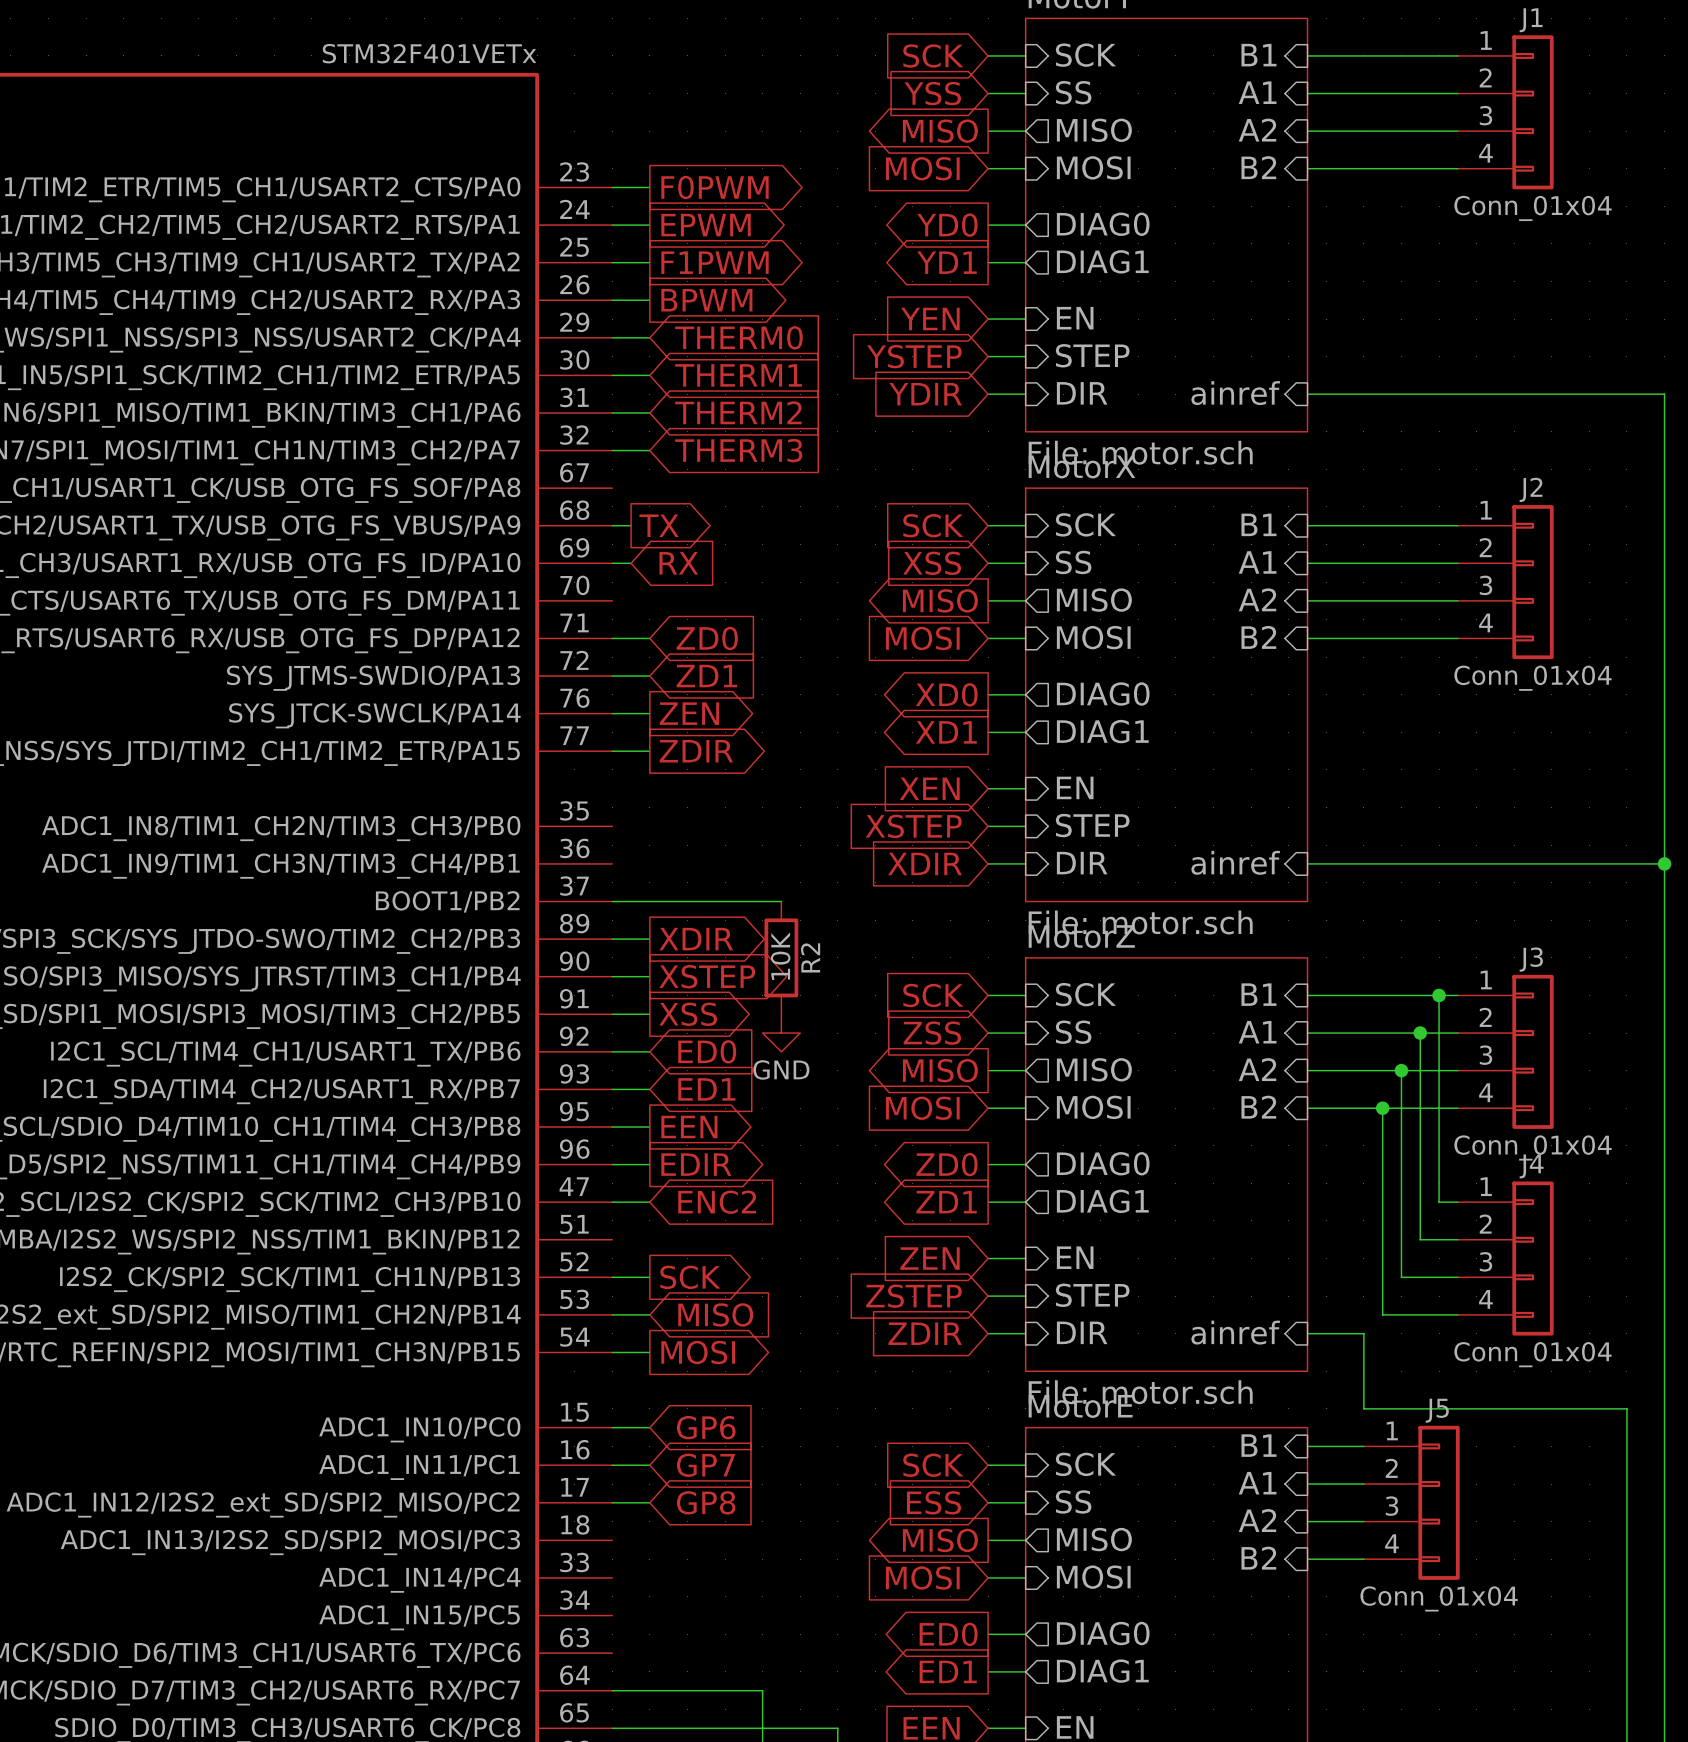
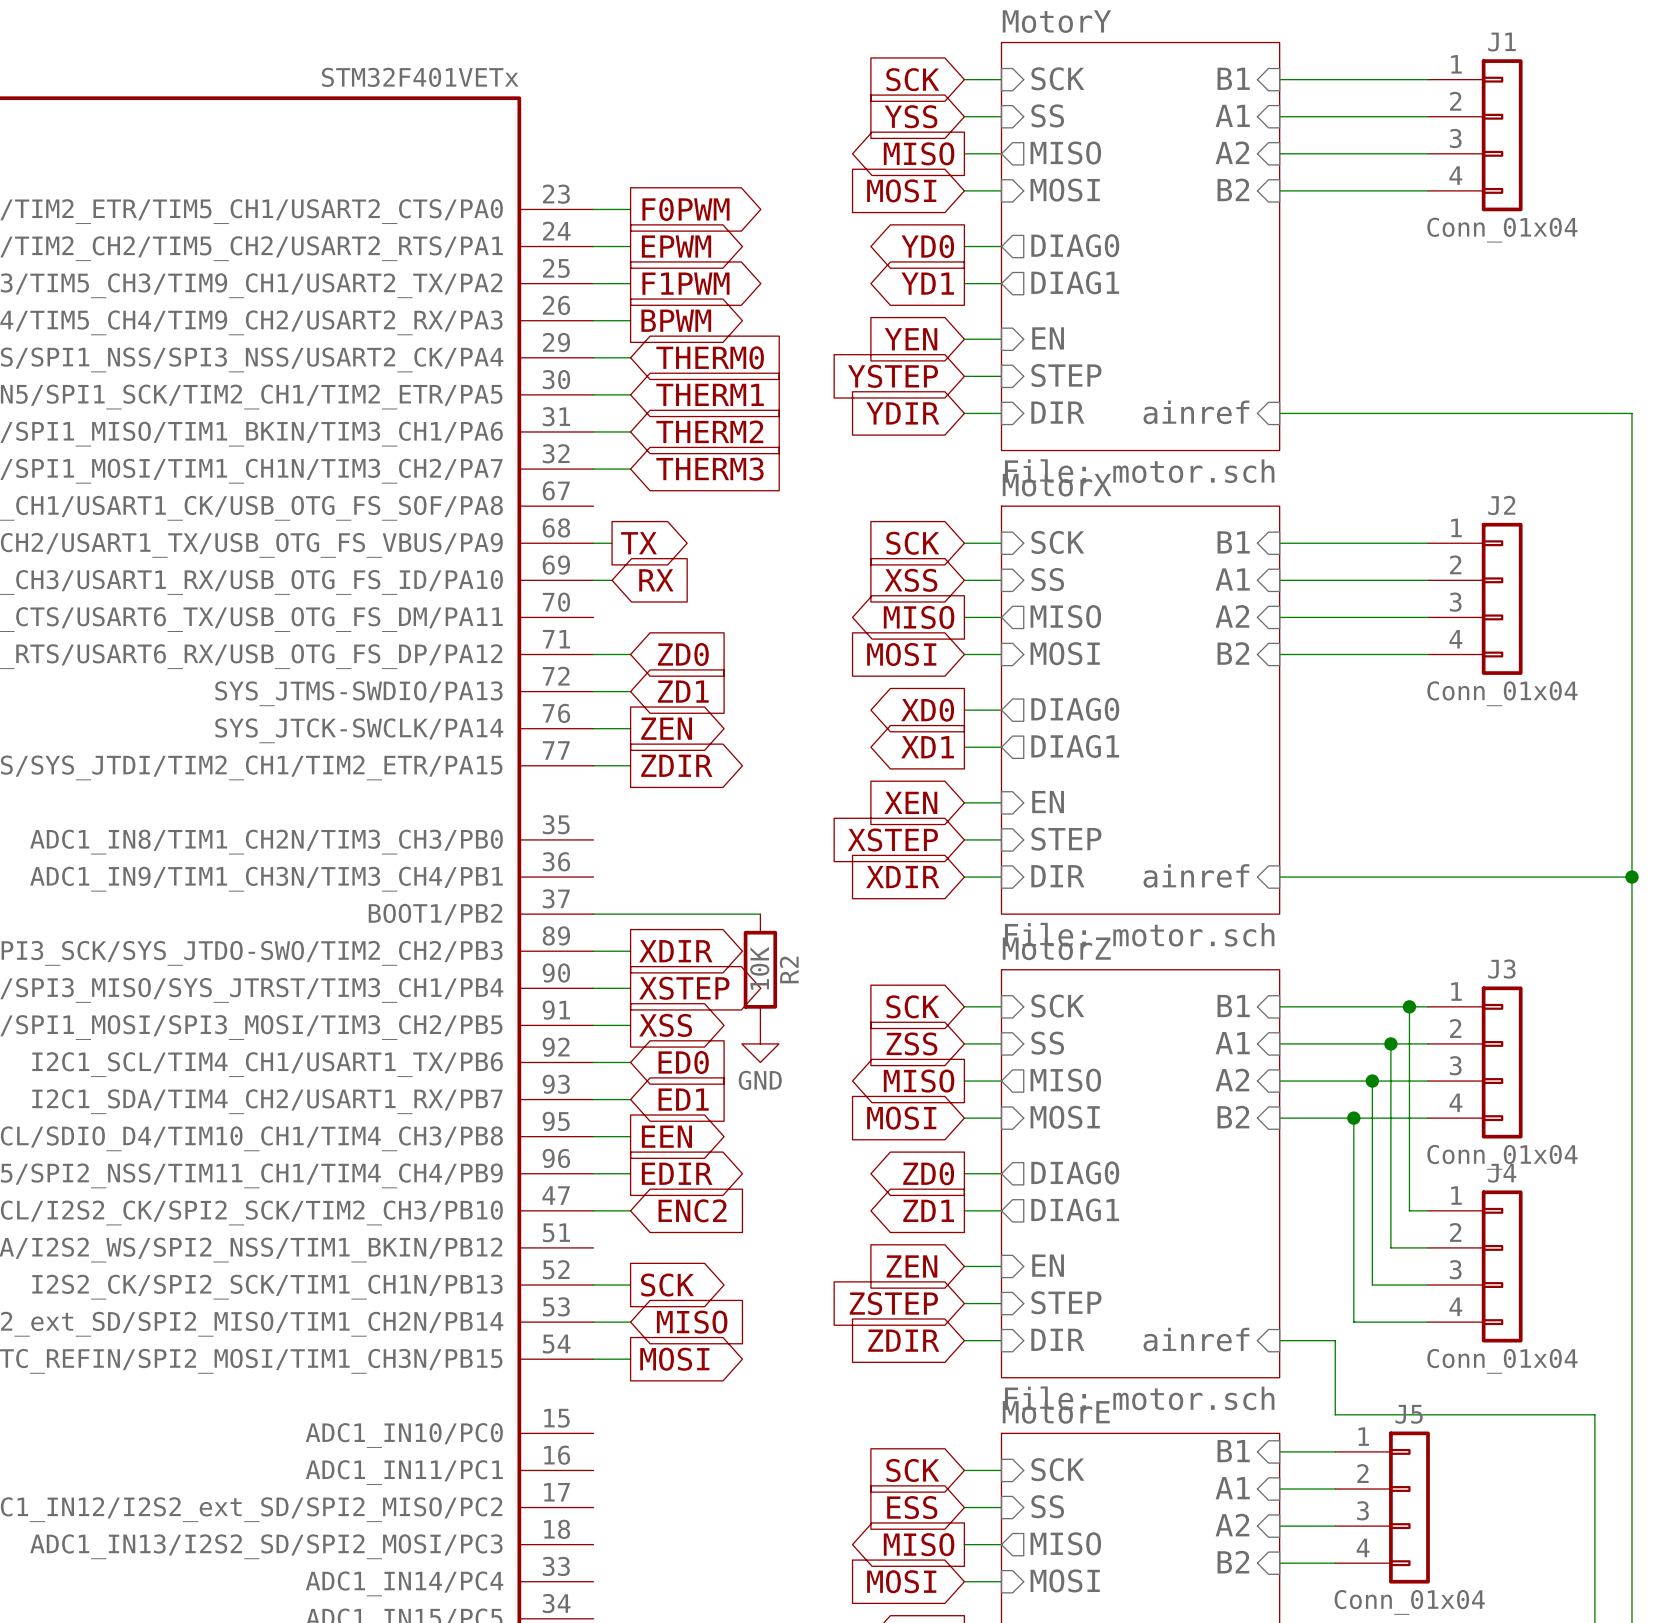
wire: (612, 1427) (649, 1427) -> none
global label: GP6 (706, 1427) -> none
wire: (612, 1465) (649, 1465) -> none
global label: GP7 (705, 1465) -> none
wire: (612, 1502) (649, 1502) -> none
global label: GP8 (706, 1502) -> none

